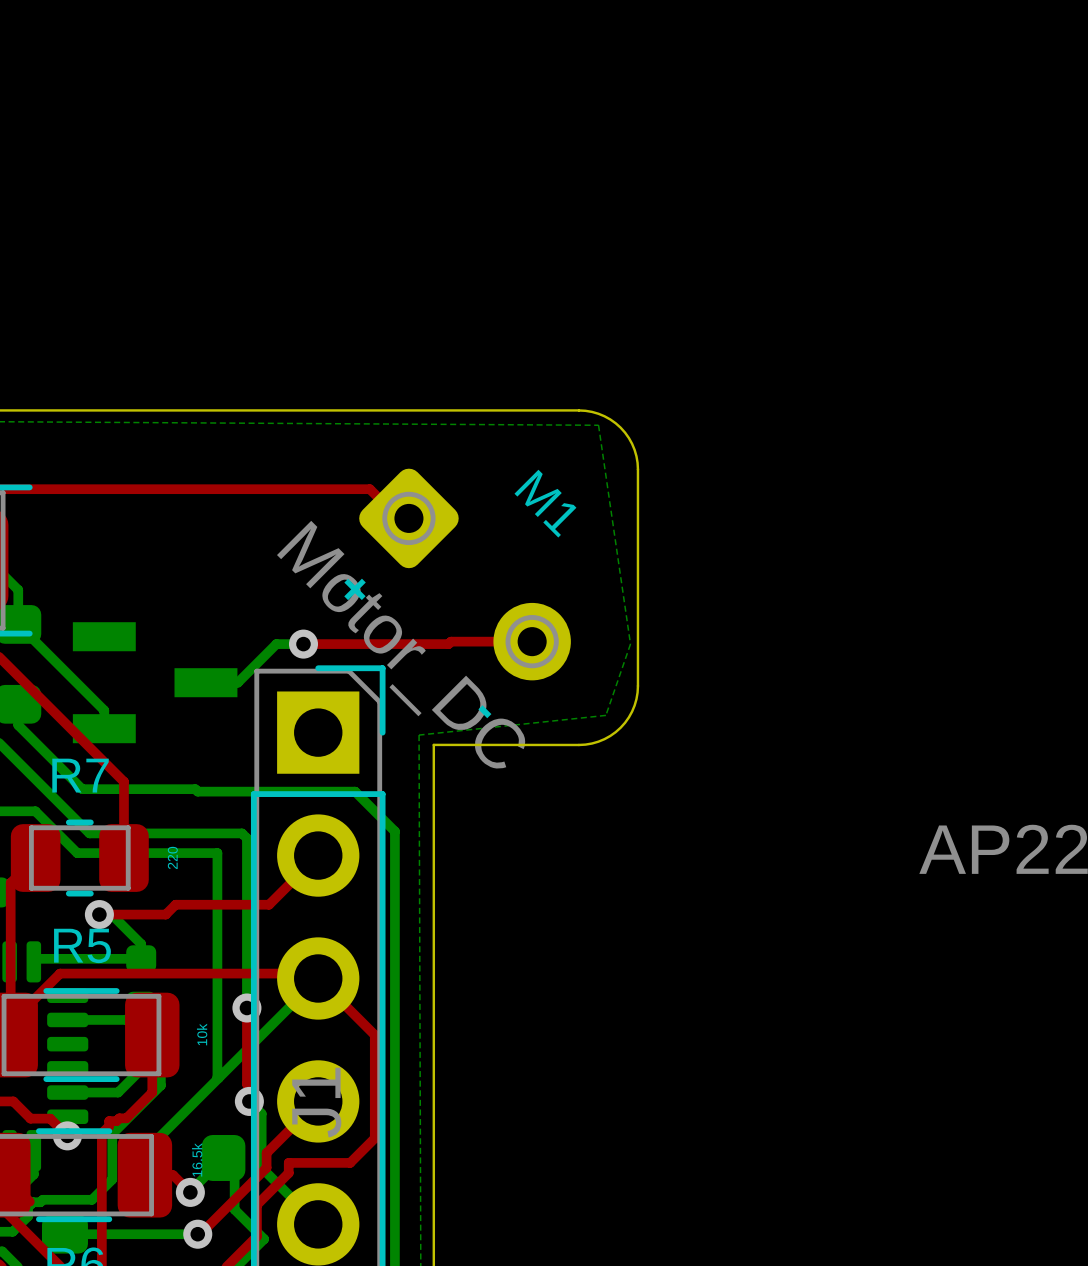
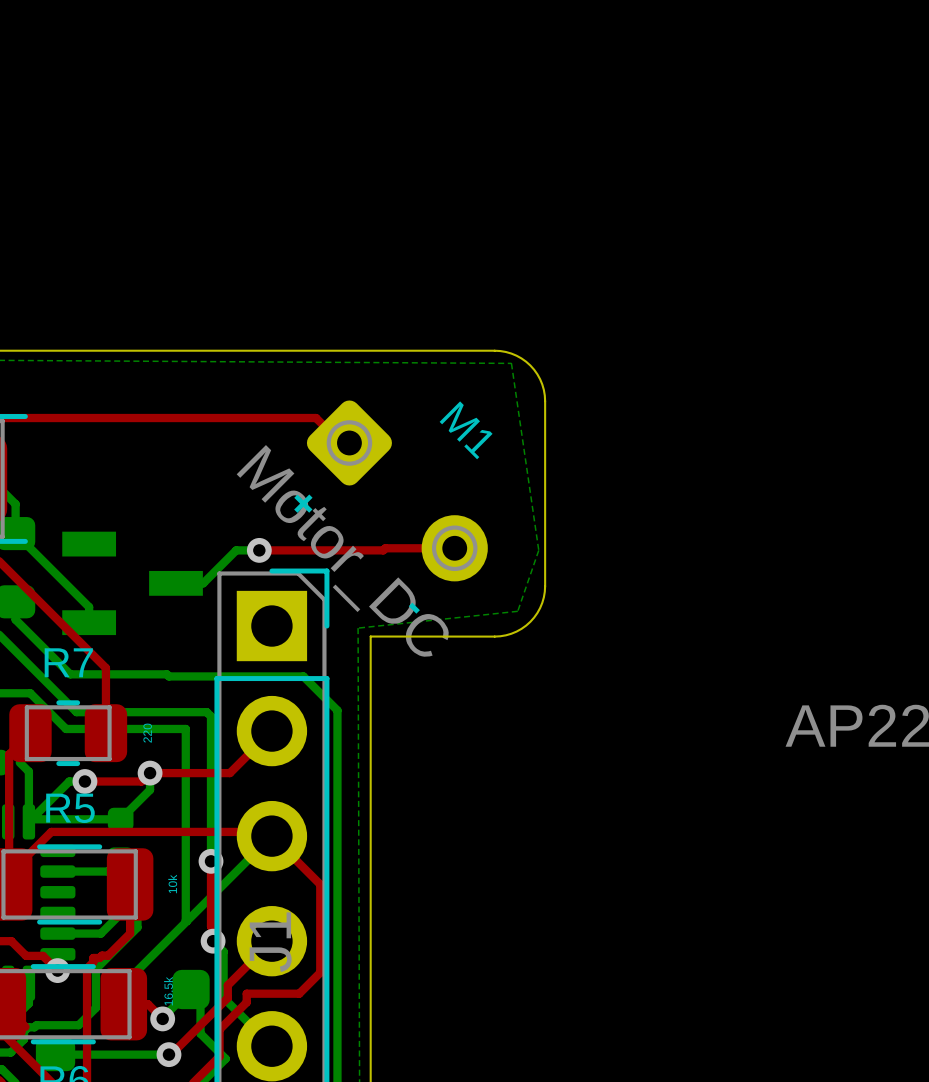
bottom track: none -> (19, 762) (28, 771) (28, 821)
via: none -> (150, 773)
bottom track: (99, 914) (111, 914) (141, 944) (141, 958) -> (150, 773) (150, 789) (120, 819)
bottom track: none -> (84, 781) (69, 781) (31, 819)

